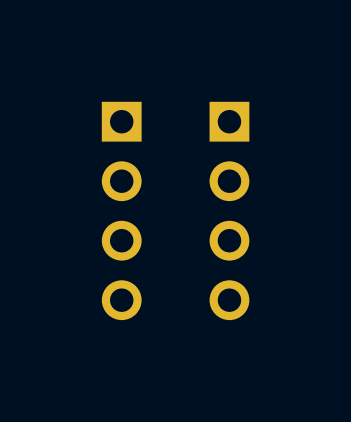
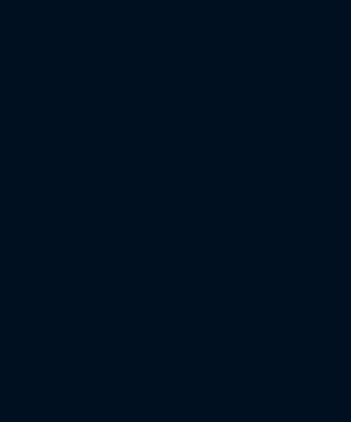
part: (121, 210) -> none
part: (229, 210) -> none

